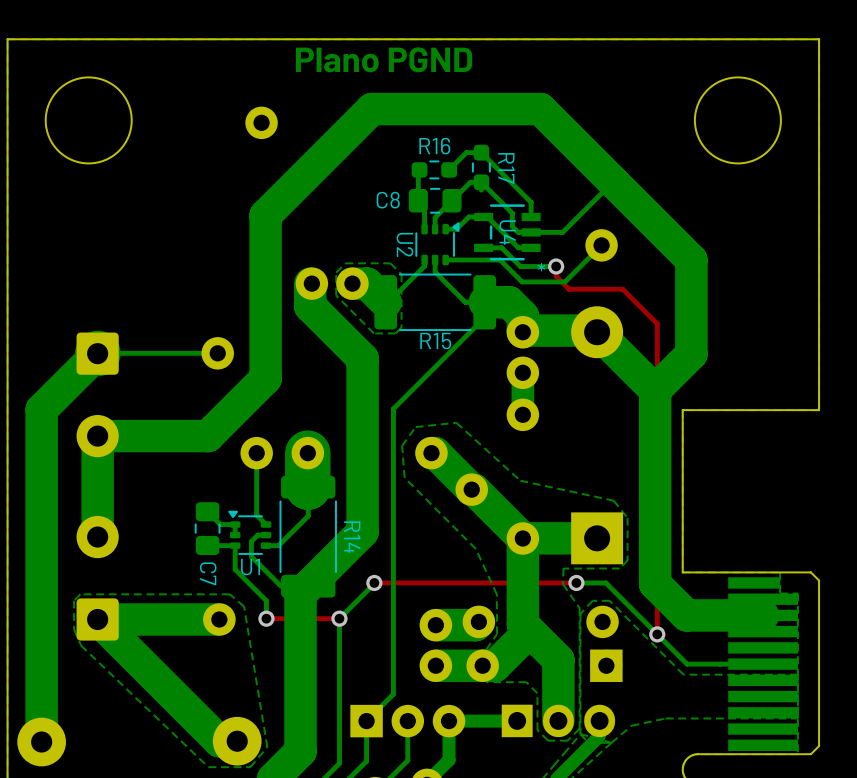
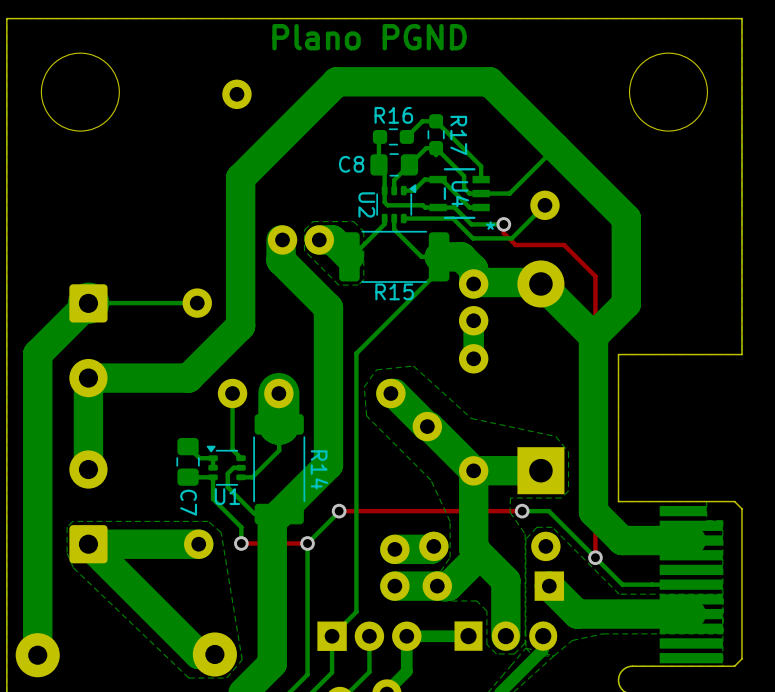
bottom track: none -> (384, 190) (384, 202) (387, 205) (422, 205) (425, 207) (438, 207)
bottom track: none -> (549, 586) (577, 614) (691, 614)

